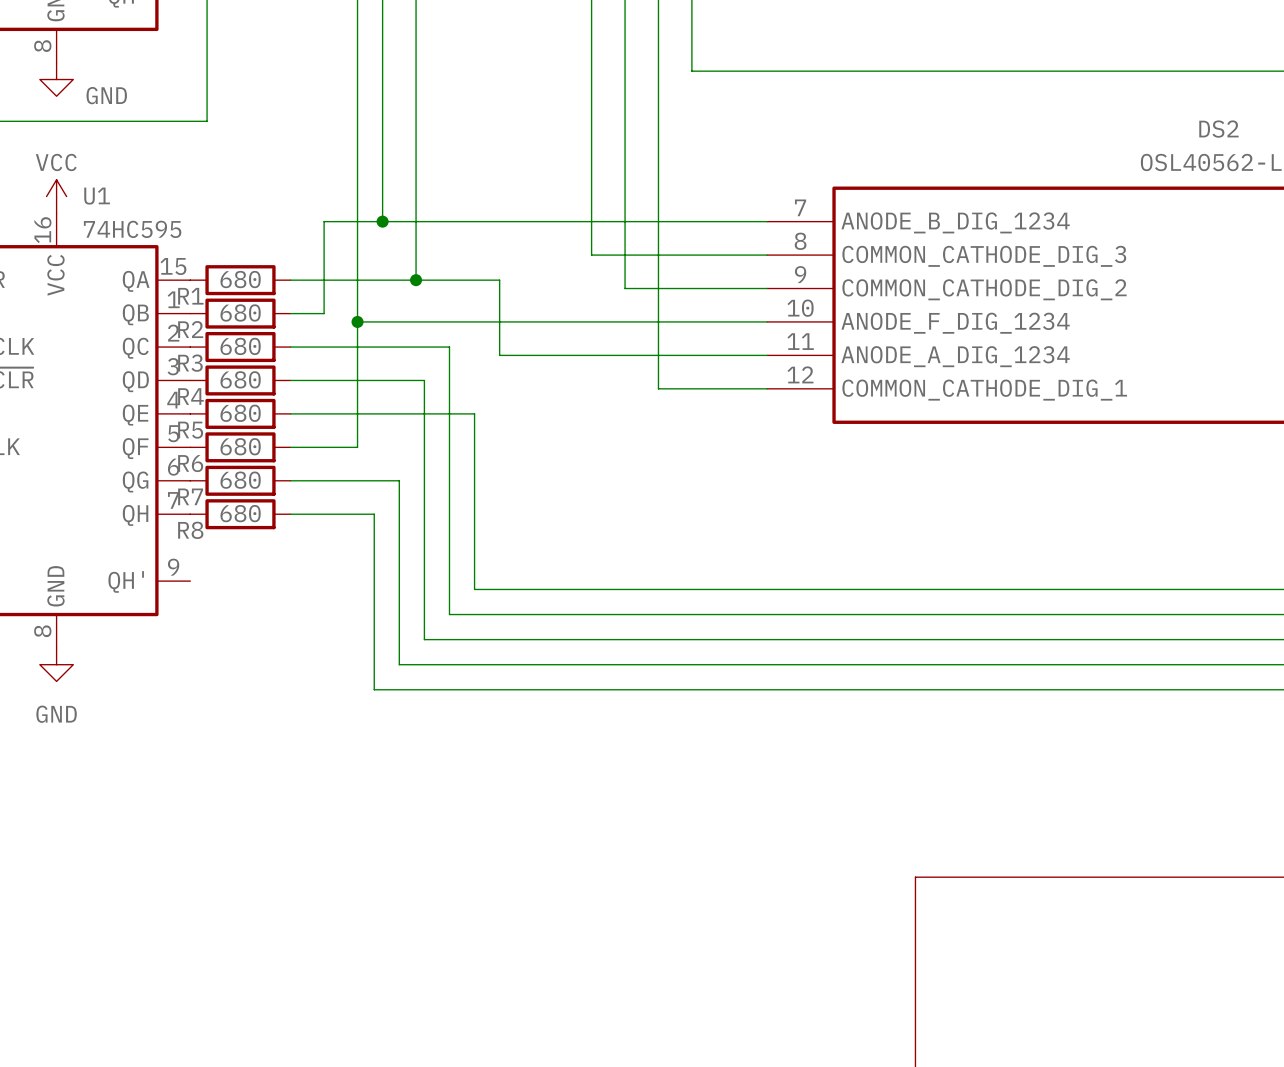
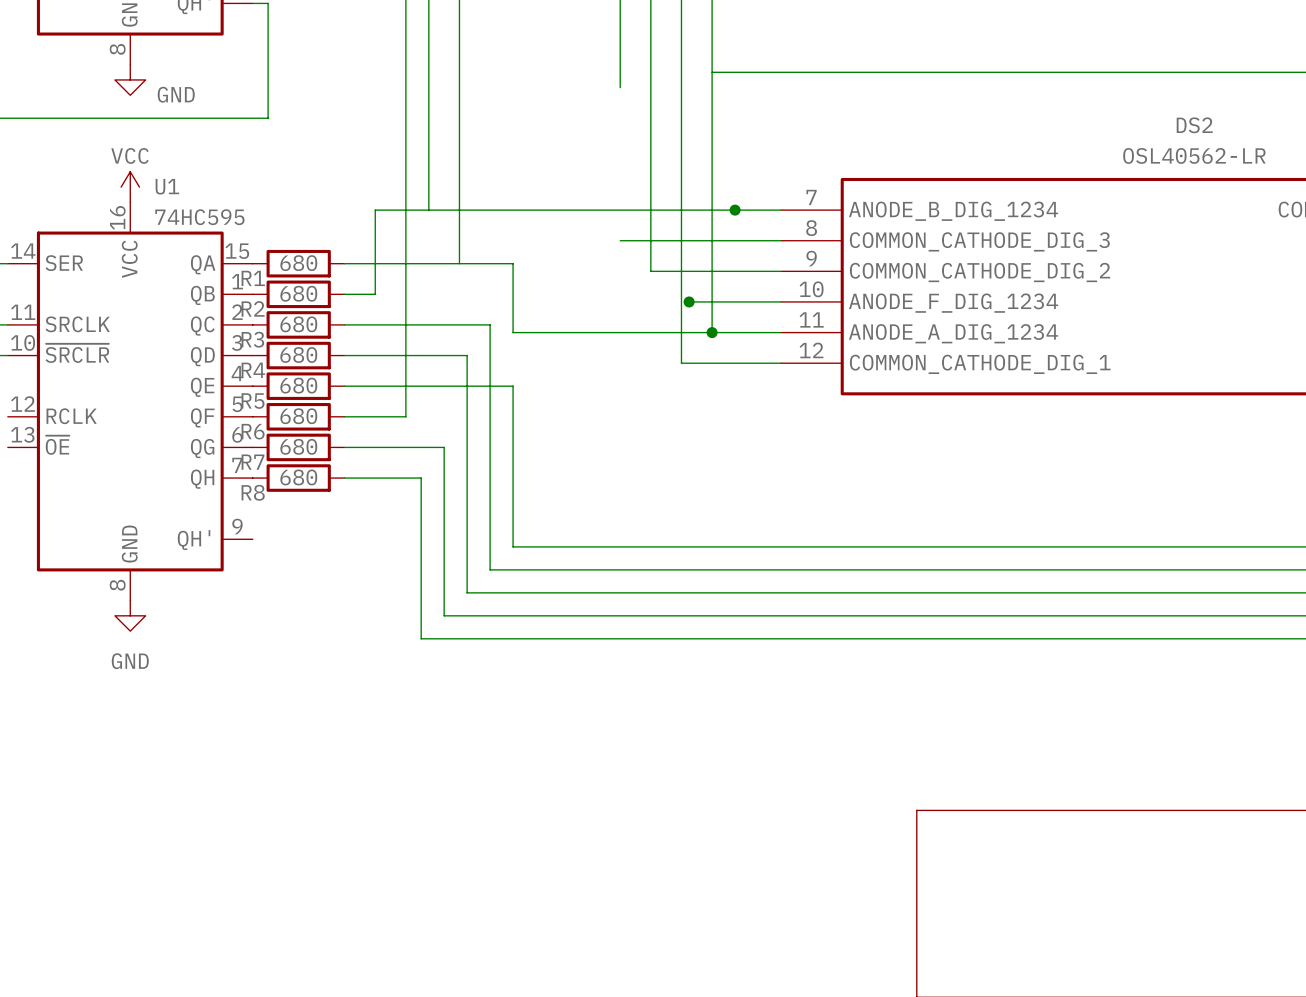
wire: none -> (712, 72) (712, 332)
wire: (591, 87) (591, 255) -> none
junction: (382, 221) -> none
junction: none -> (735, 210)
junction: (416, 280) -> none
wire: (474, 280) (499, 280) (499, 355) -> (513, 263) (513, 332) (536, 332)
wire: (357, 321) (666, 321) -> none
junction: (357, 321) -> none
junction: none -> (689, 301)
junction: none -> (712, 332)

